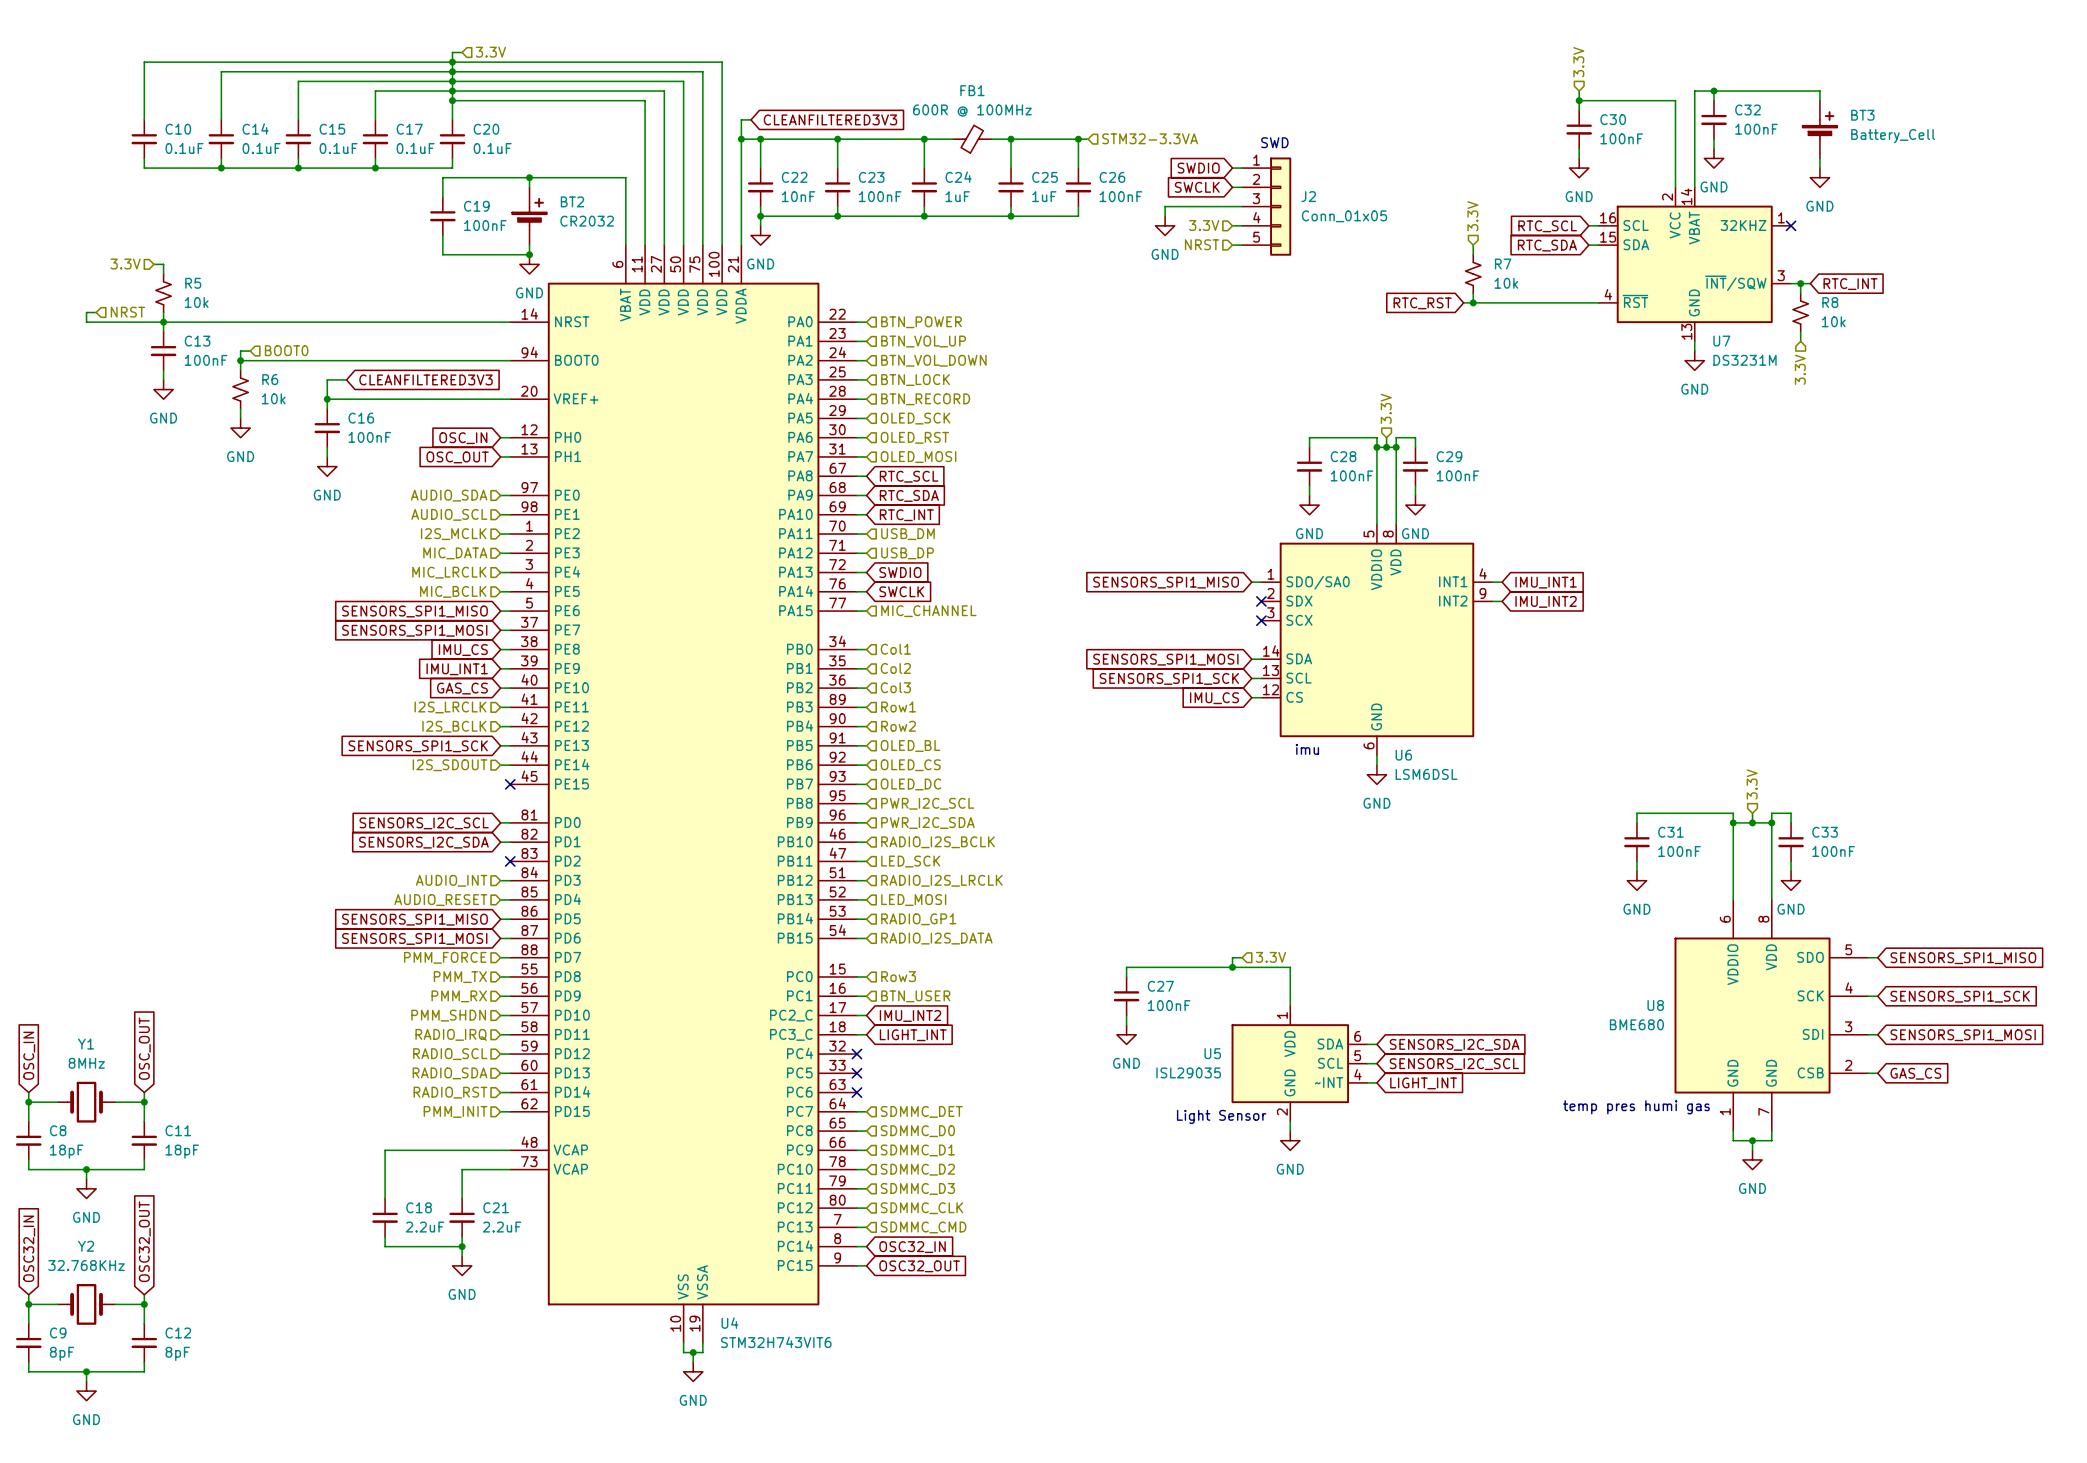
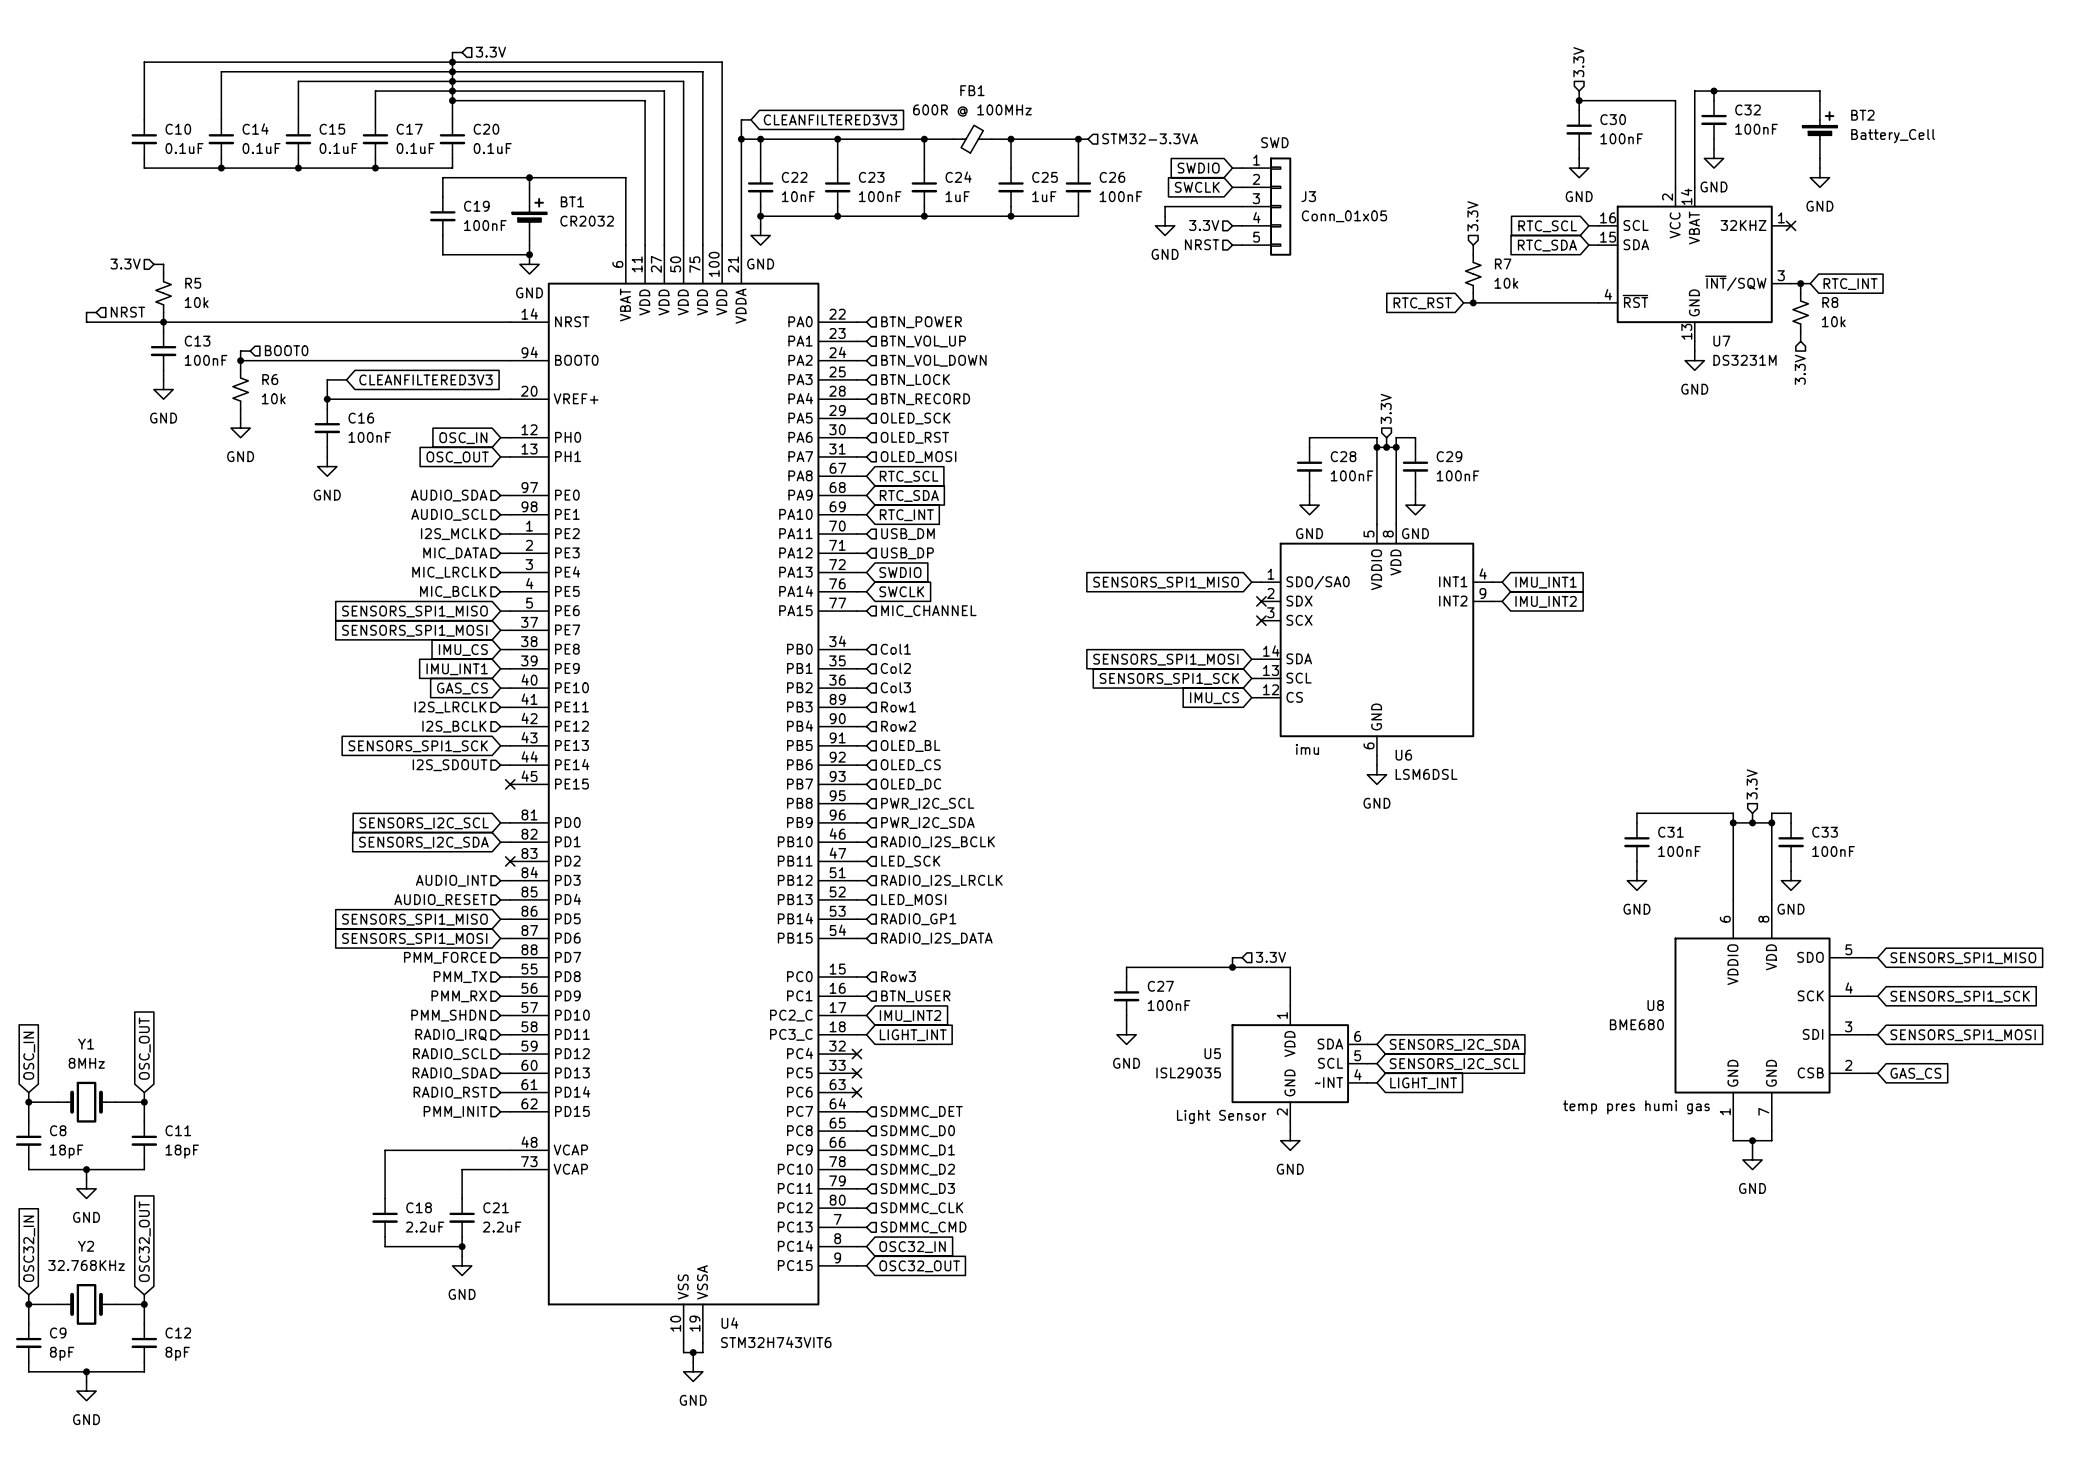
BT3 name: BT3 (1862, 115) -> BT2 (1862, 115)
J2 name: J2 (1308, 196) -> J3 (1308, 196)
BT2 name: BT2 (572, 201) -> BT1 (572, 201)

